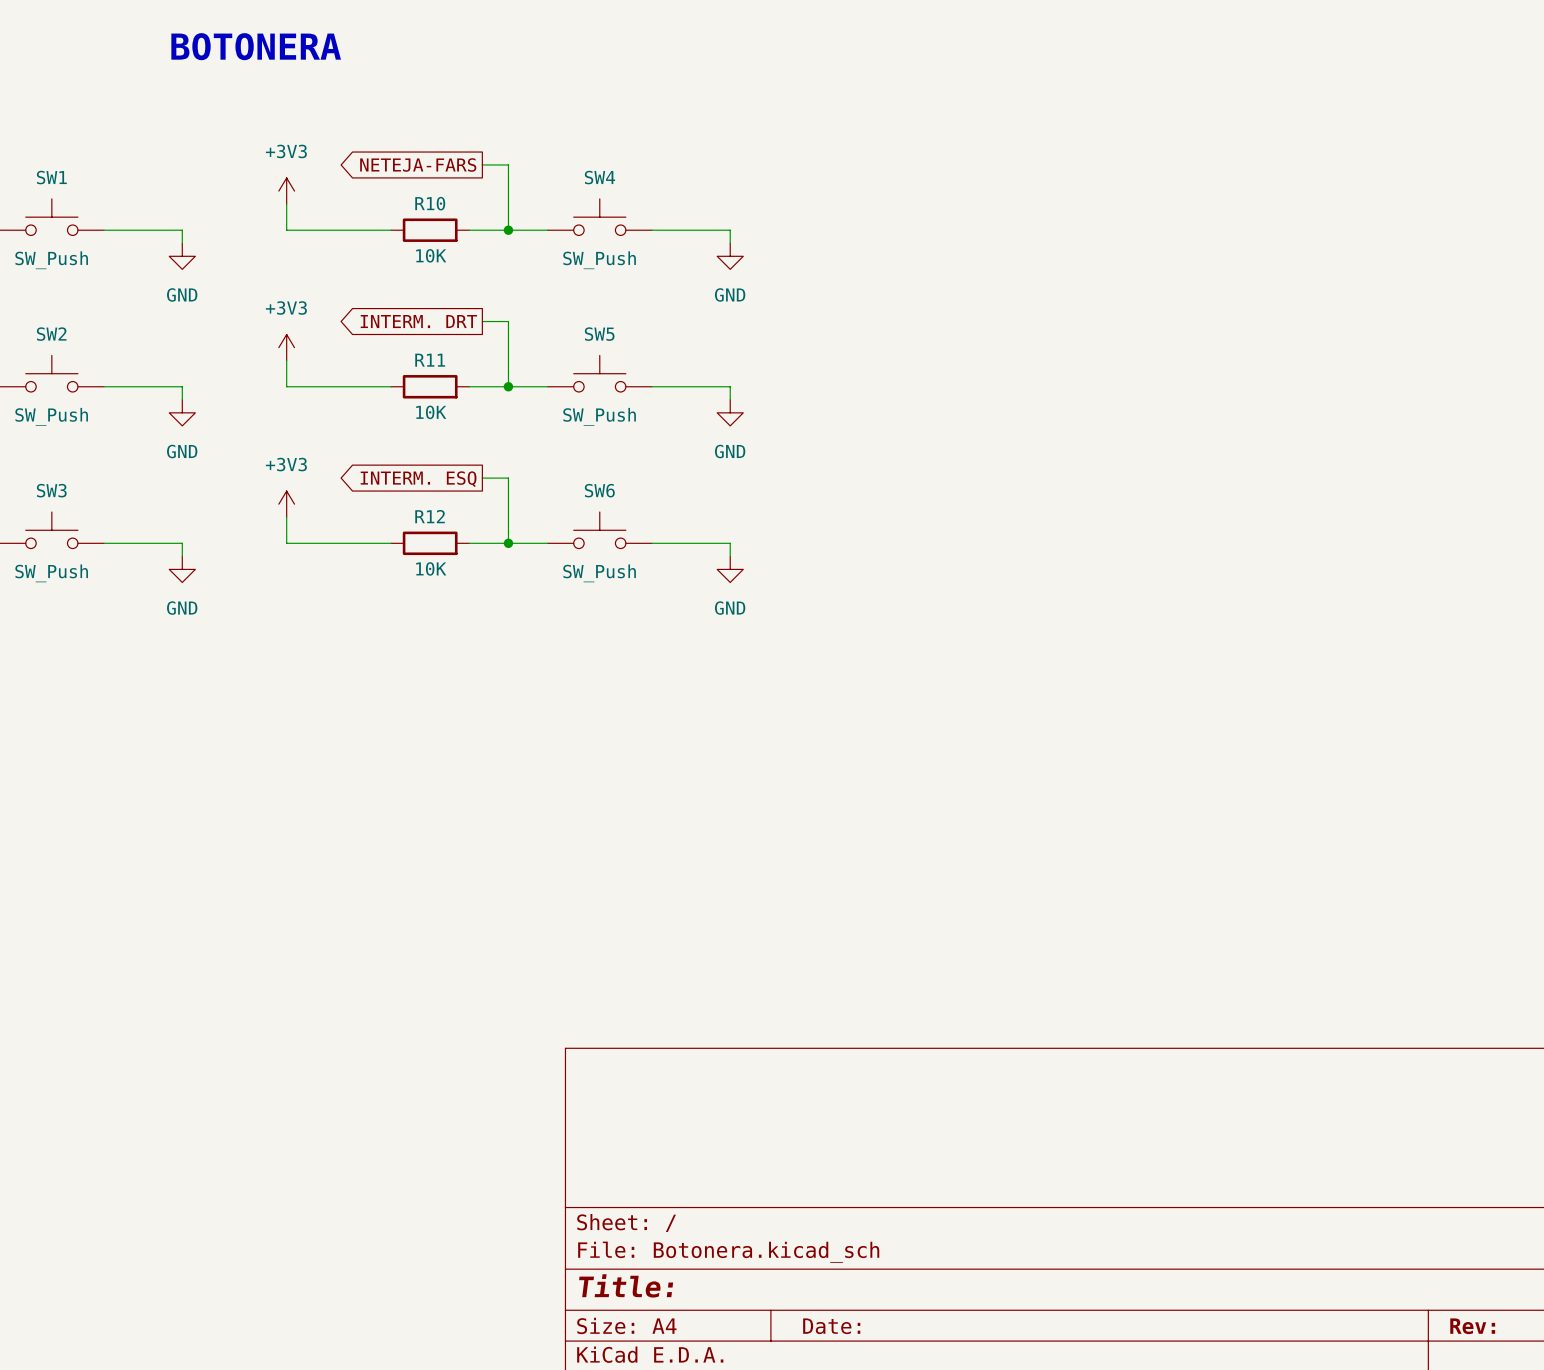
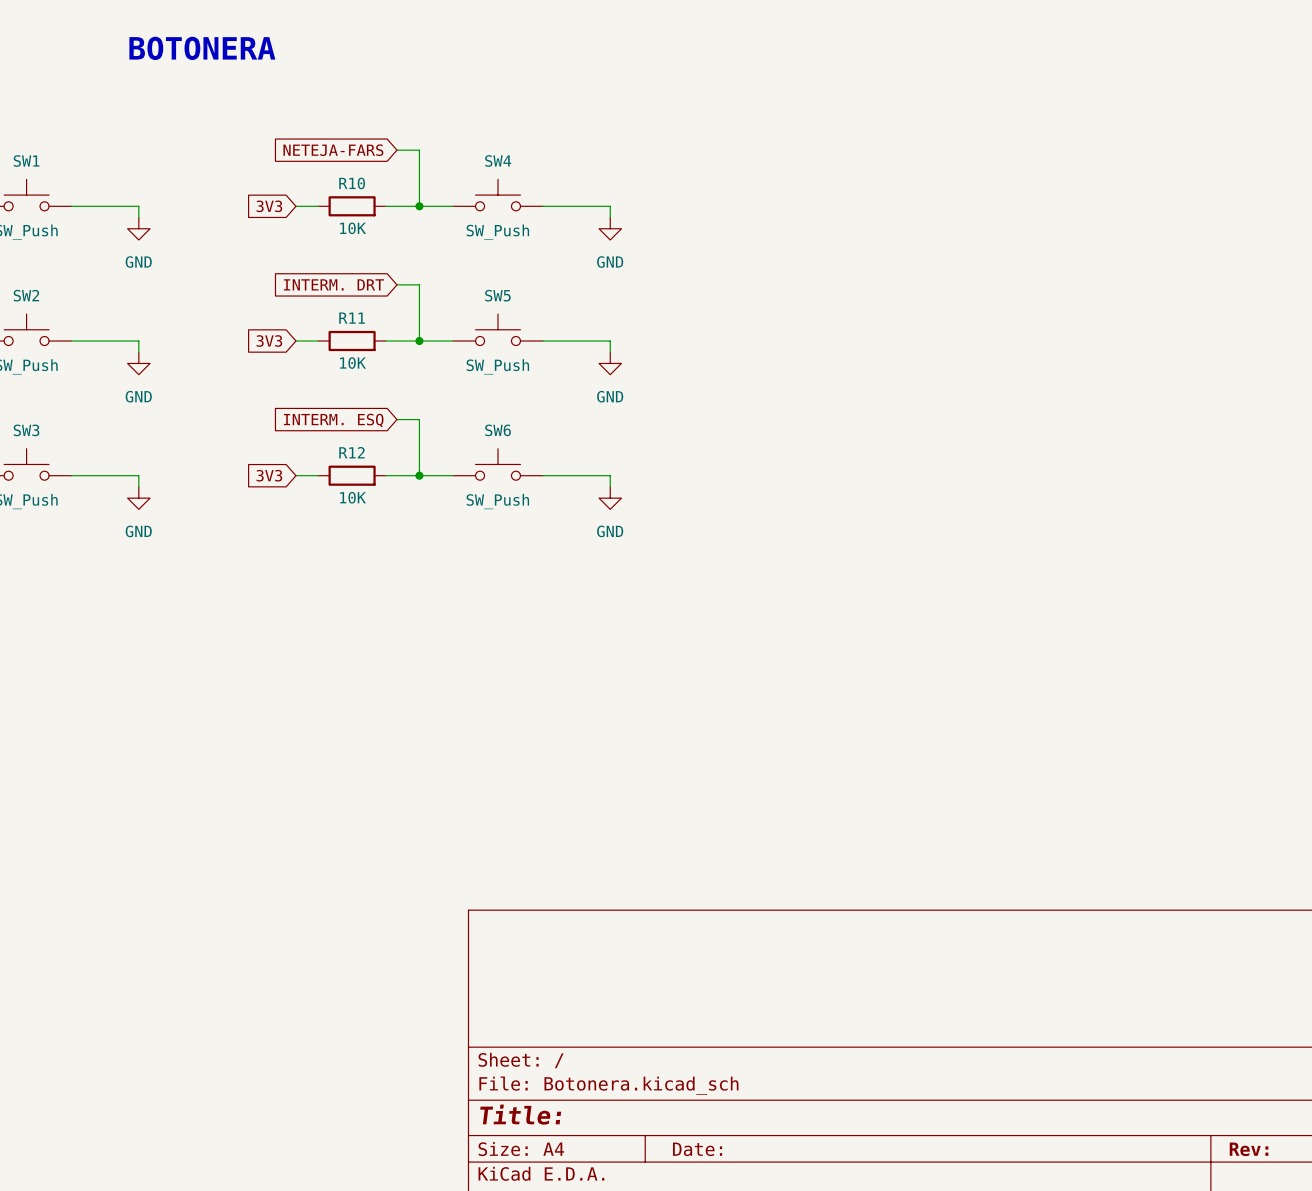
global label shape: output (418, 164) -> input (333, 150)
power symbol: +3V3 (286, 191) -> none
wire: (286, 204) (286, 230) (364, 230) -> none
global label: none -> 3V3 (269, 206)
global label shape: output (418, 321) -> input (333, 284)
power symbol: +3V3 (286, 347) -> none
wire: (286, 360) (286, 386) (364, 386) -> none
global label: none -> 3V3 (269, 341)
global label shape: output (418, 479) -> input (333, 420)
power symbol: +3V3 (286, 504) -> none
wire: (286, 517) (286, 543) (364, 543) -> none
global label: none -> 3V3 (269, 475)

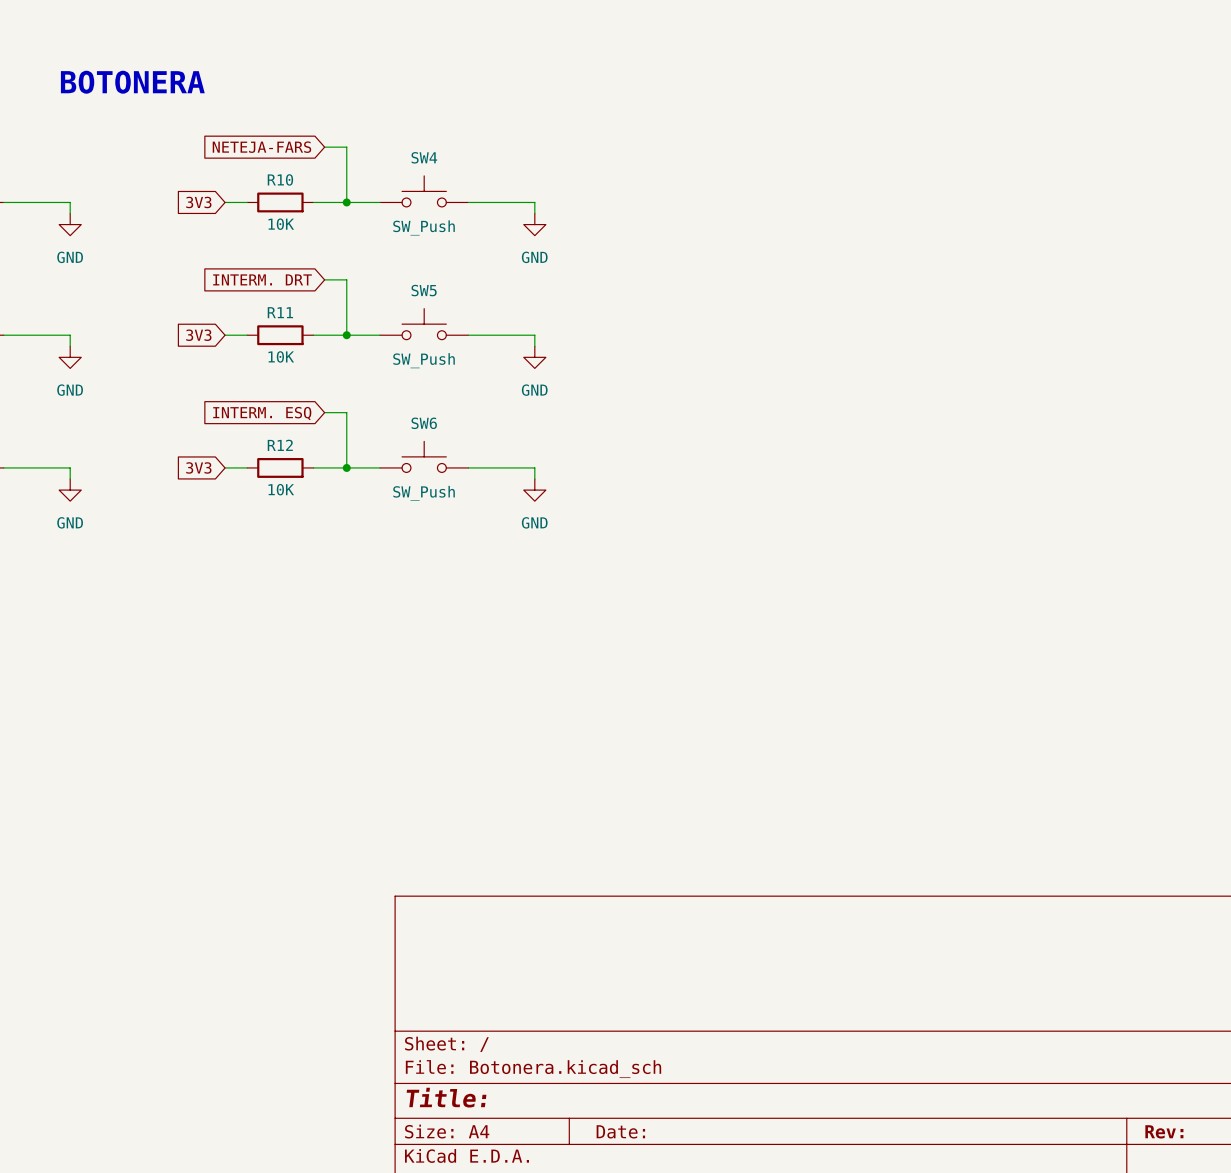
text position: BOTONERA (202, 48) -> BOTONERA (132, 82)

